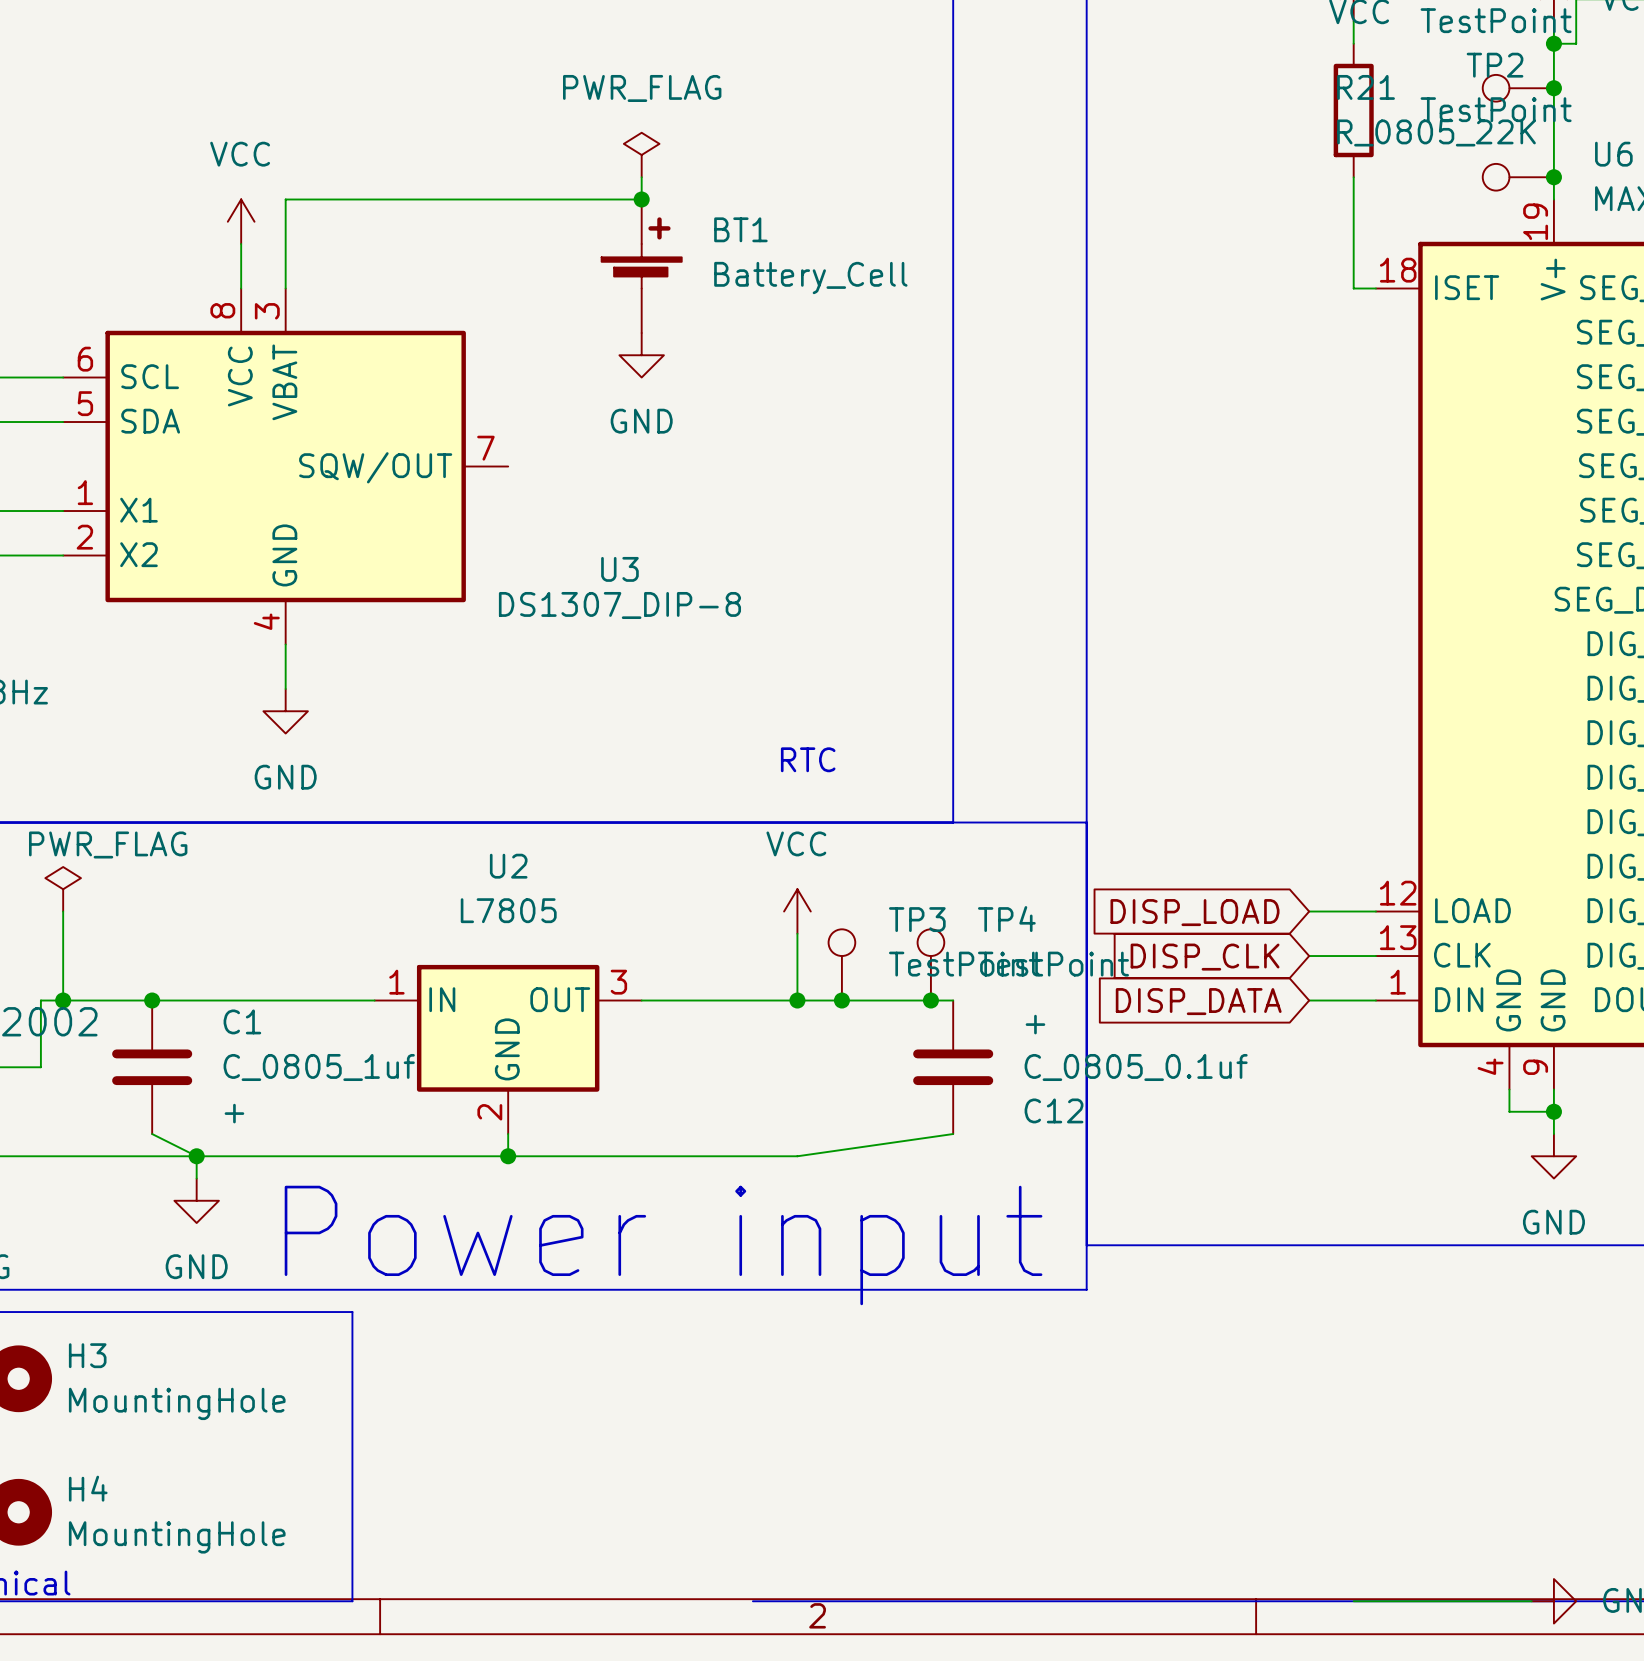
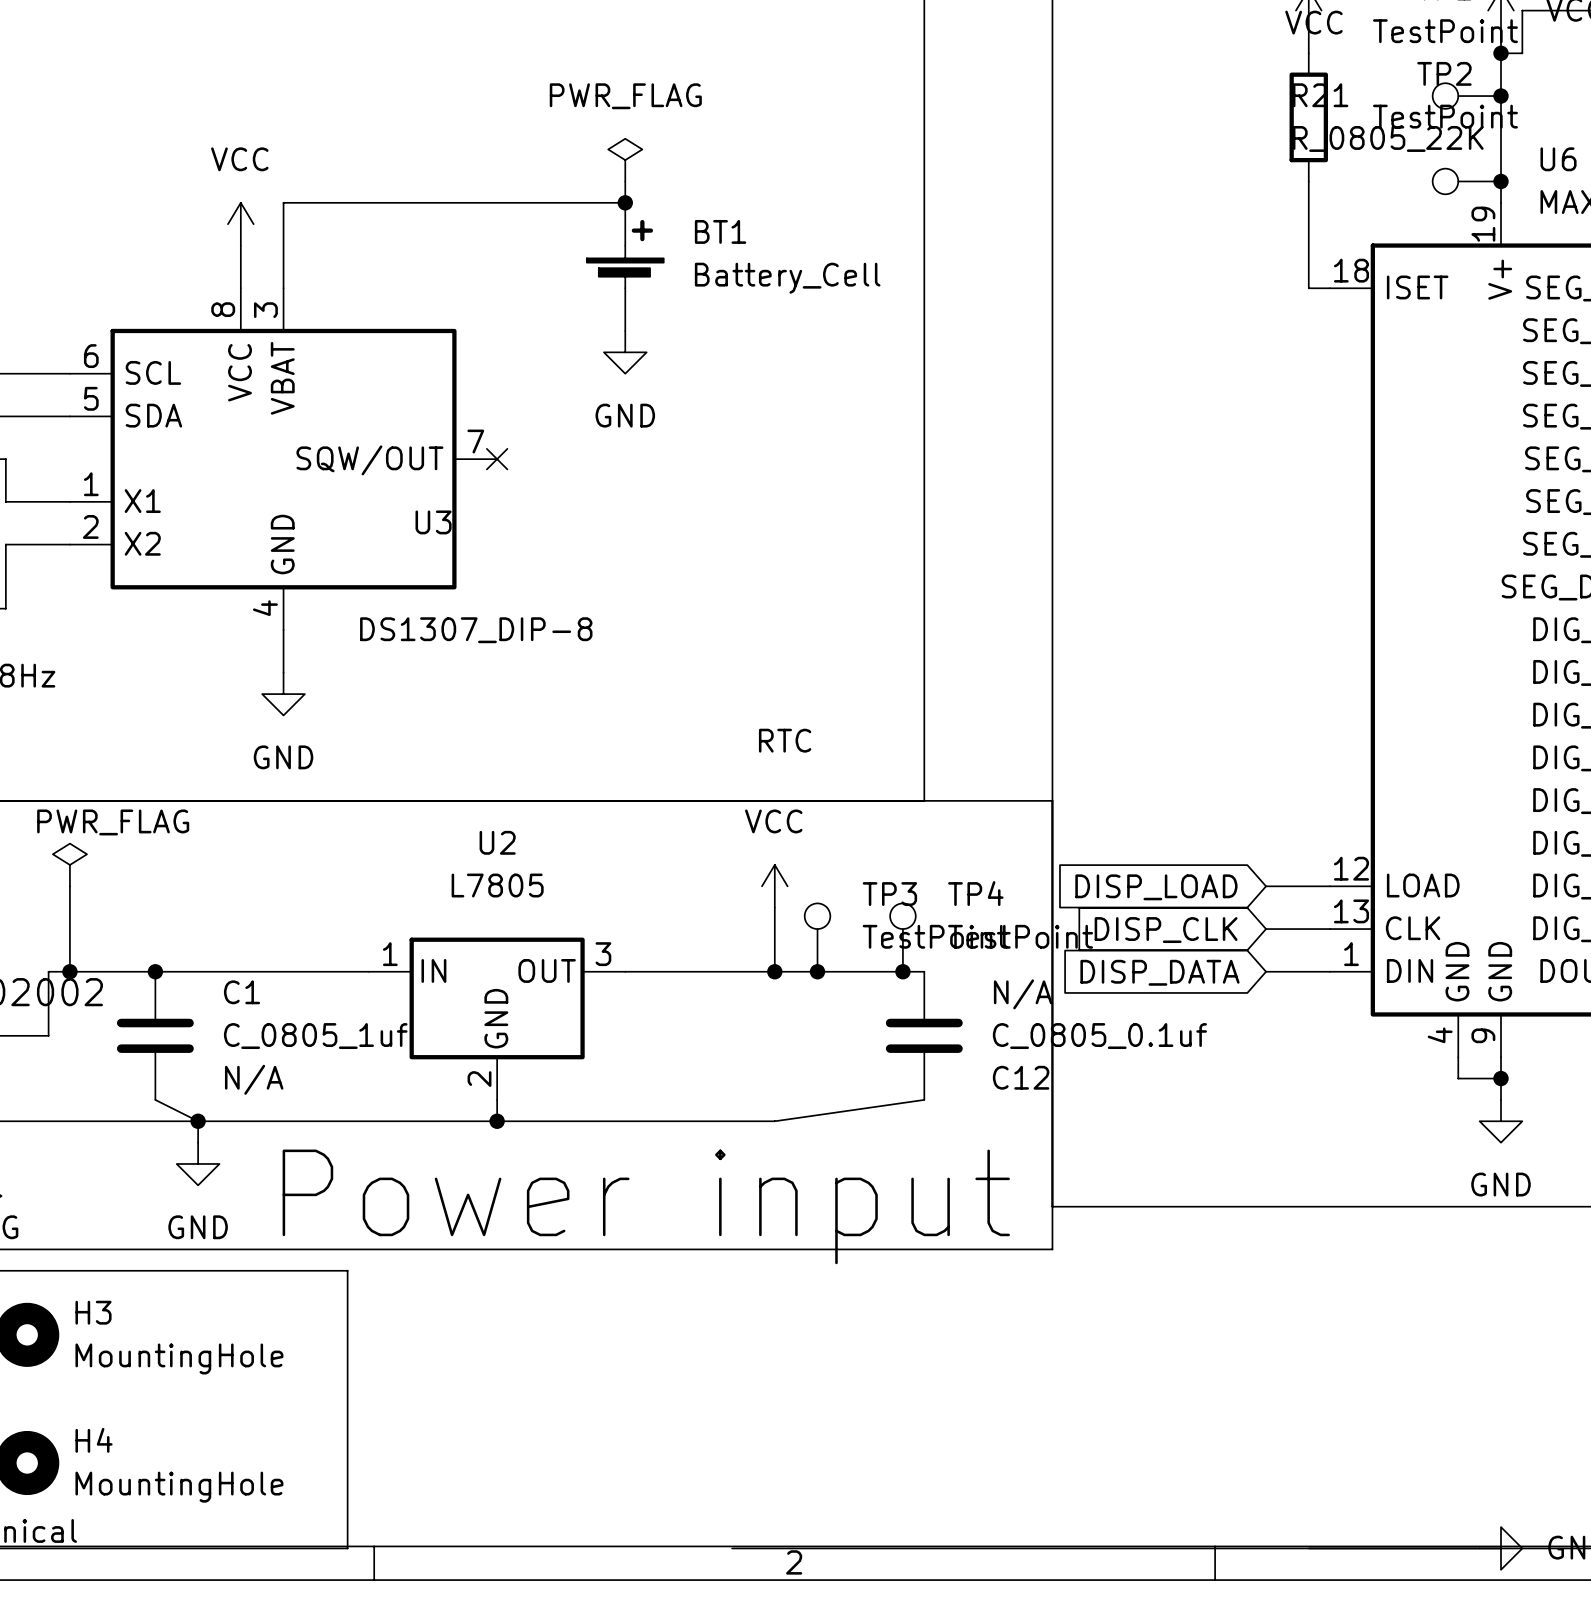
no-connect mark: none -> (497, 459)
U3 name position: U3 (619, 569) -> U3 (433, 522)
U3 value position: DS1307_DIP-8 (619, 605) -> DS1307_DIP-8 (476, 630)
C12 text: + (1035, 1024) -> N/A (1023, 994)
C1 text: + (234, 1113) -> N/A (254, 1079)

